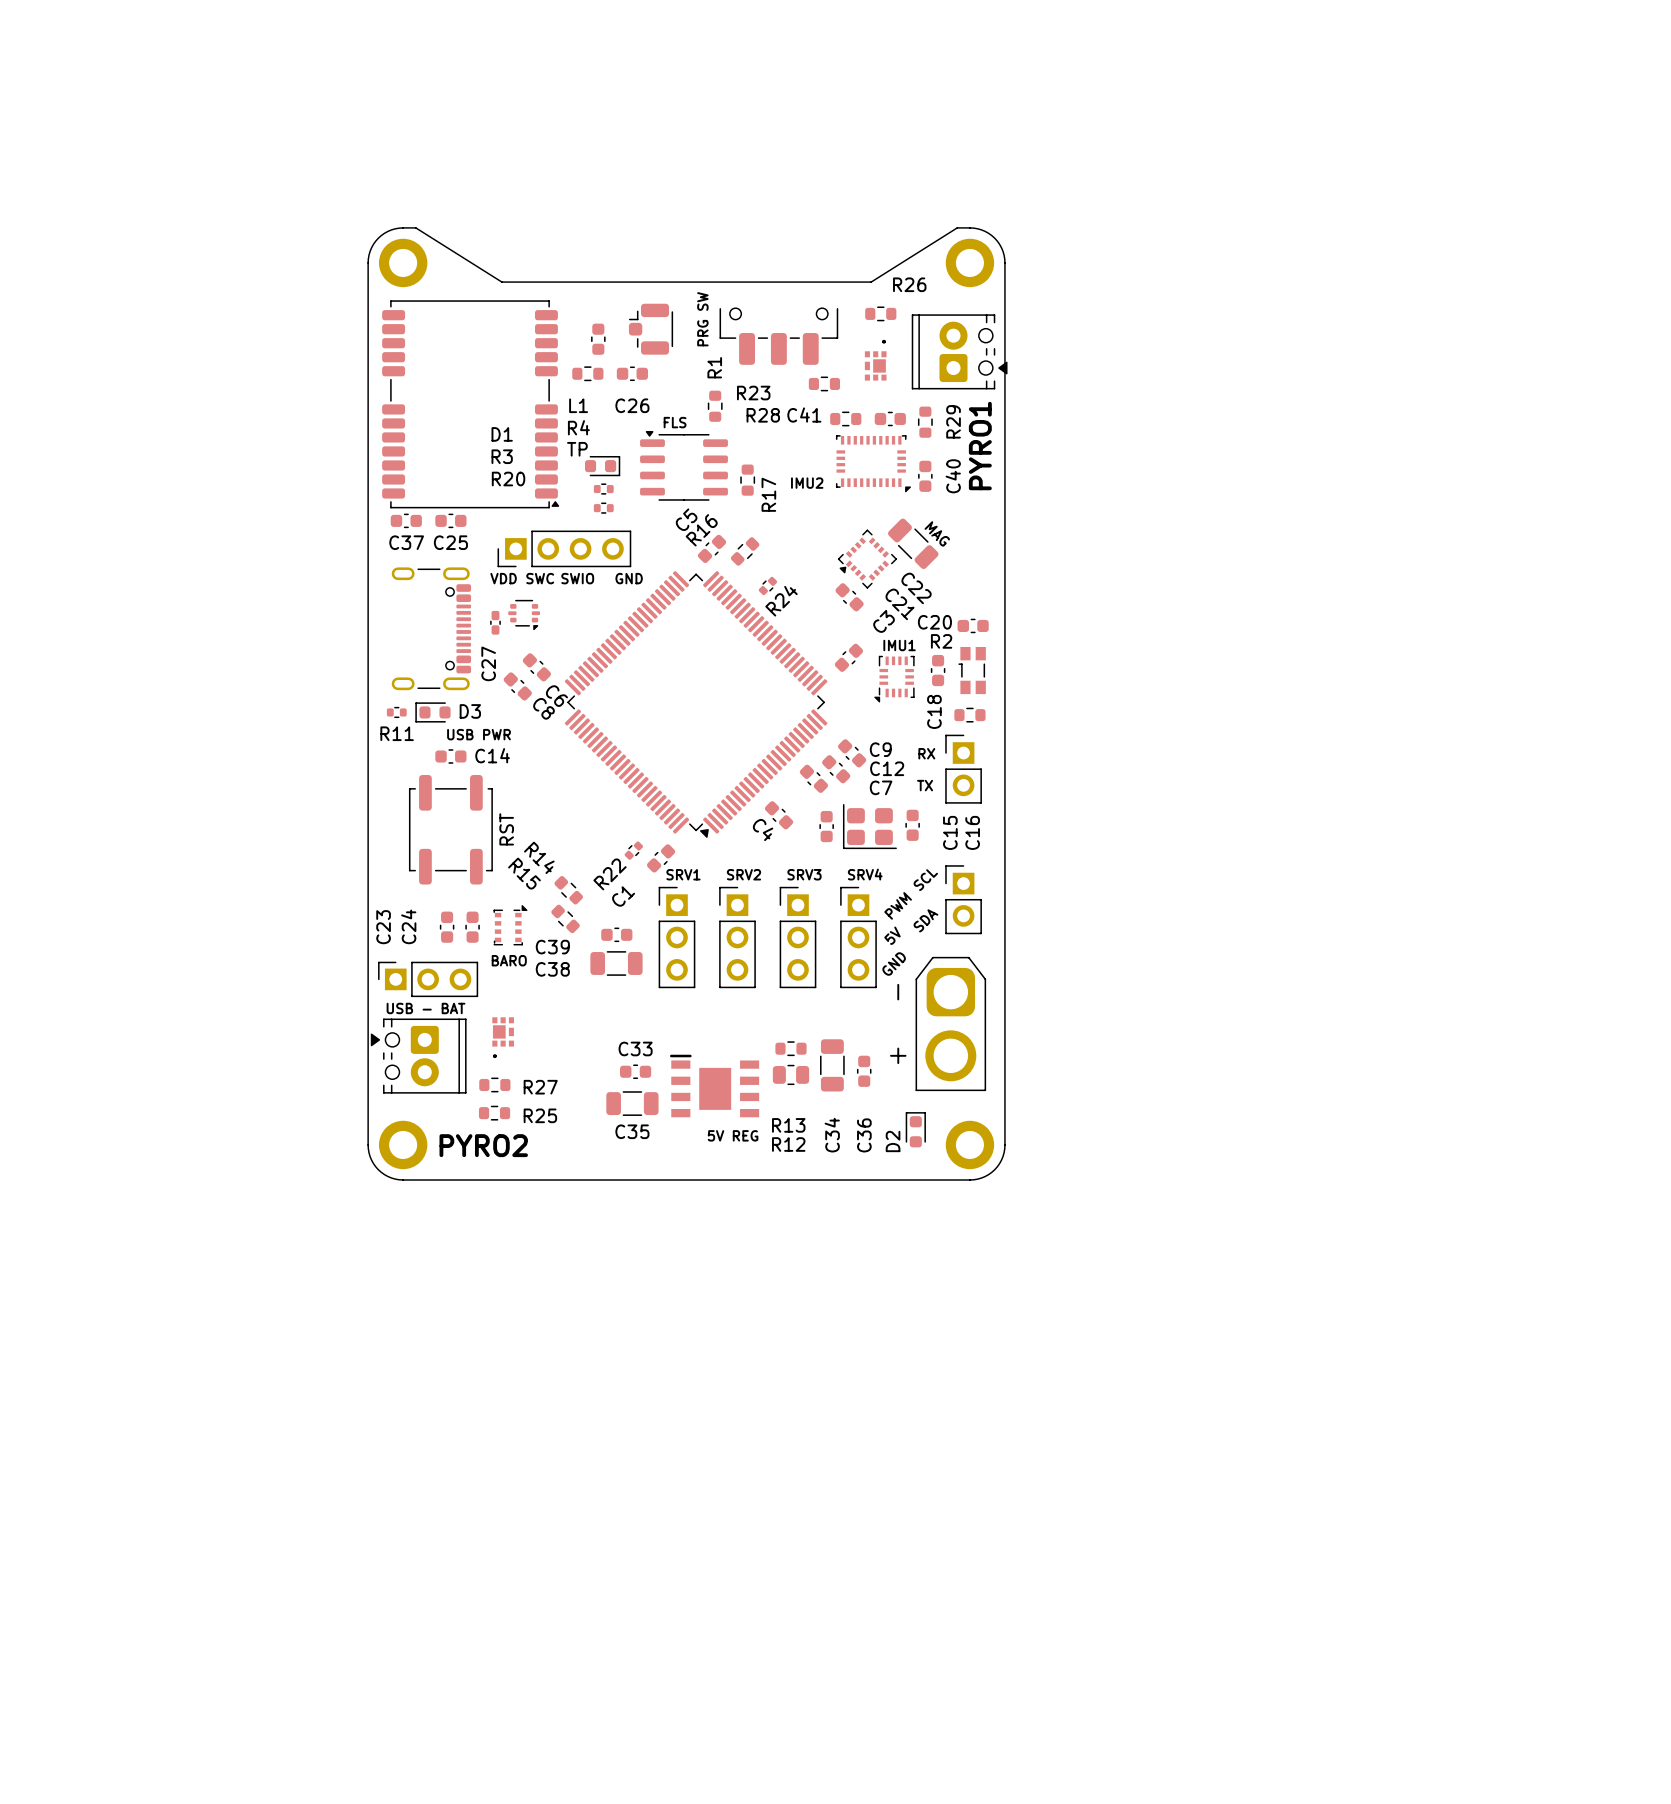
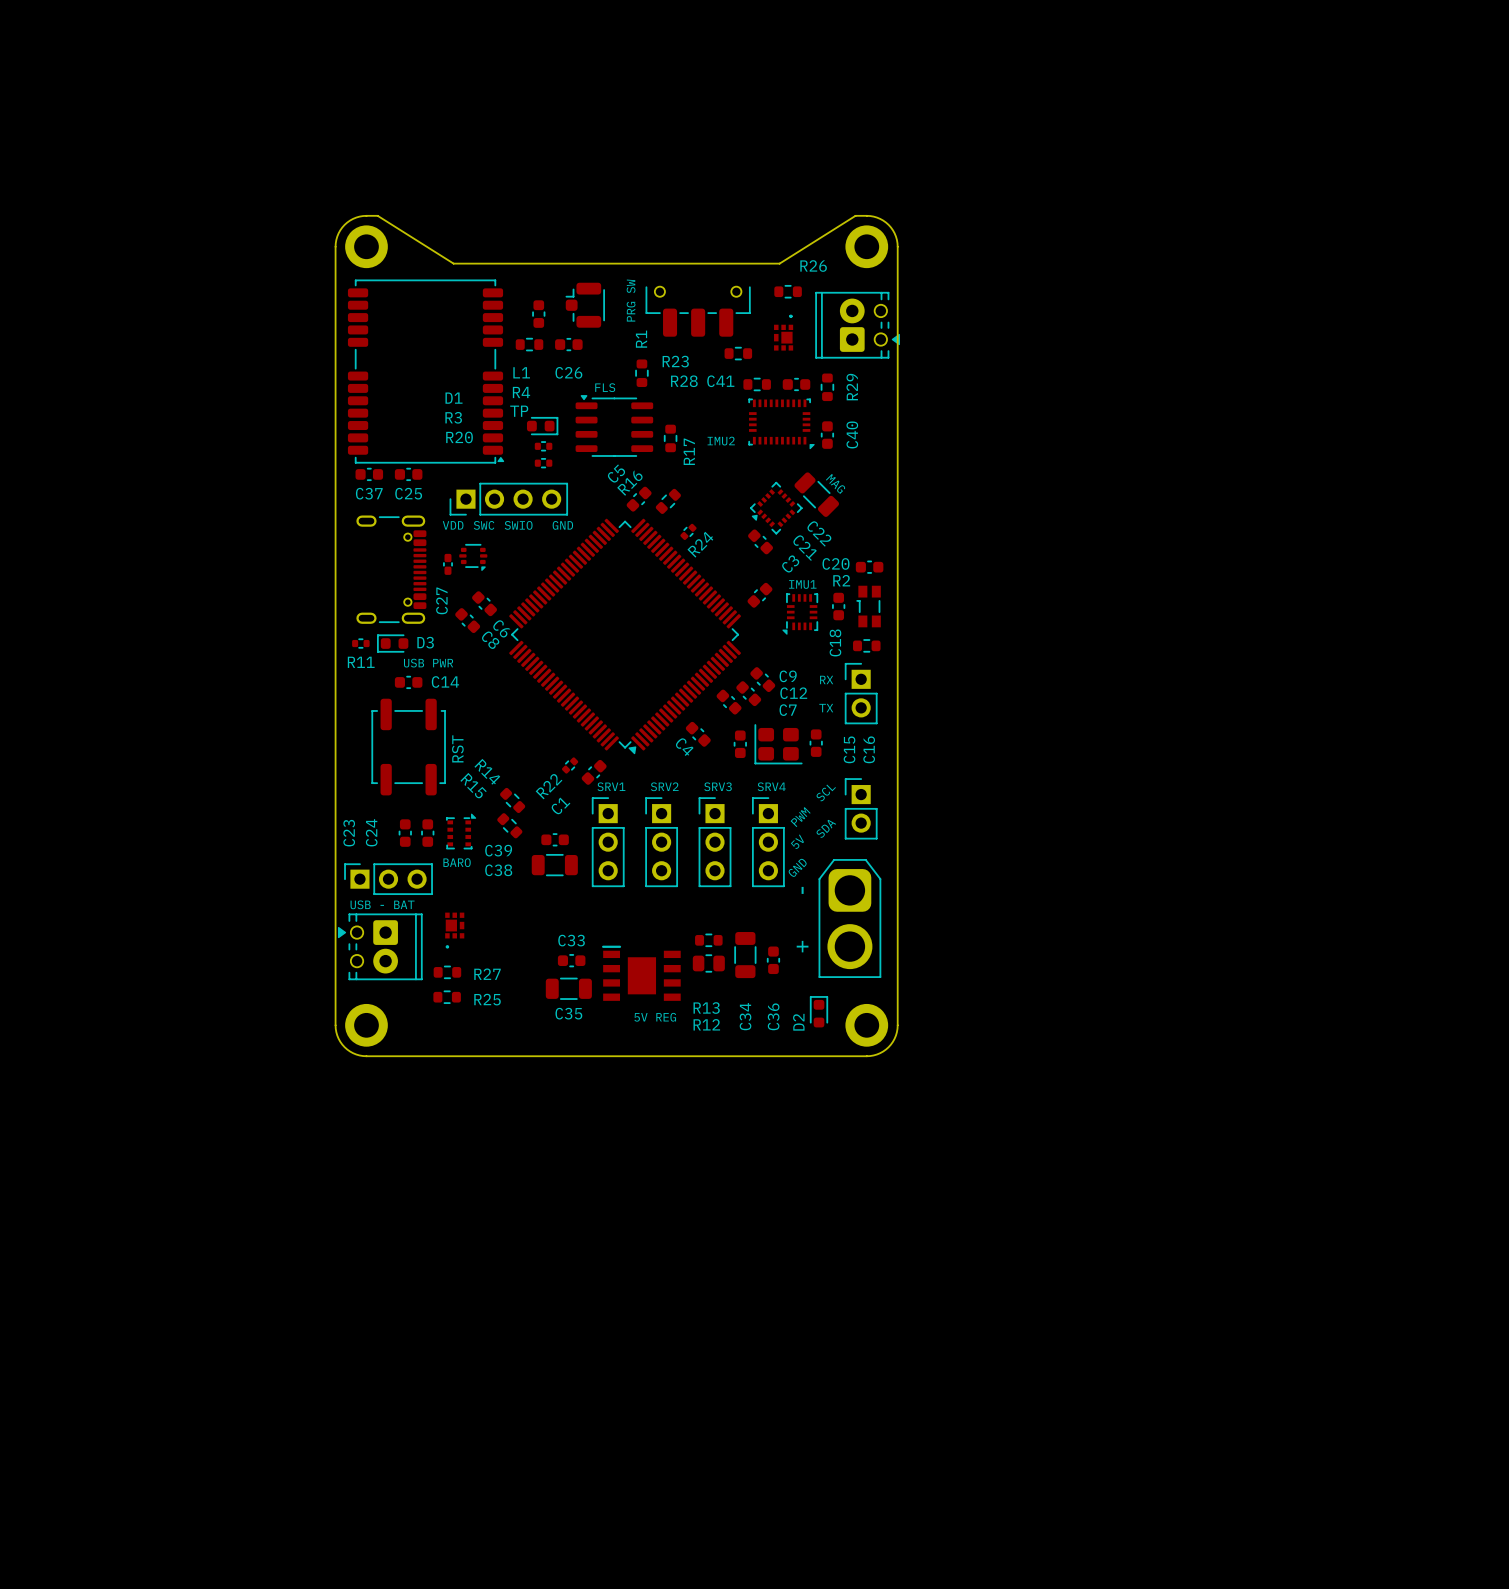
text: PYRO1 (980, 446) -> none
text: PYRO2 (483, 1145) -> none

